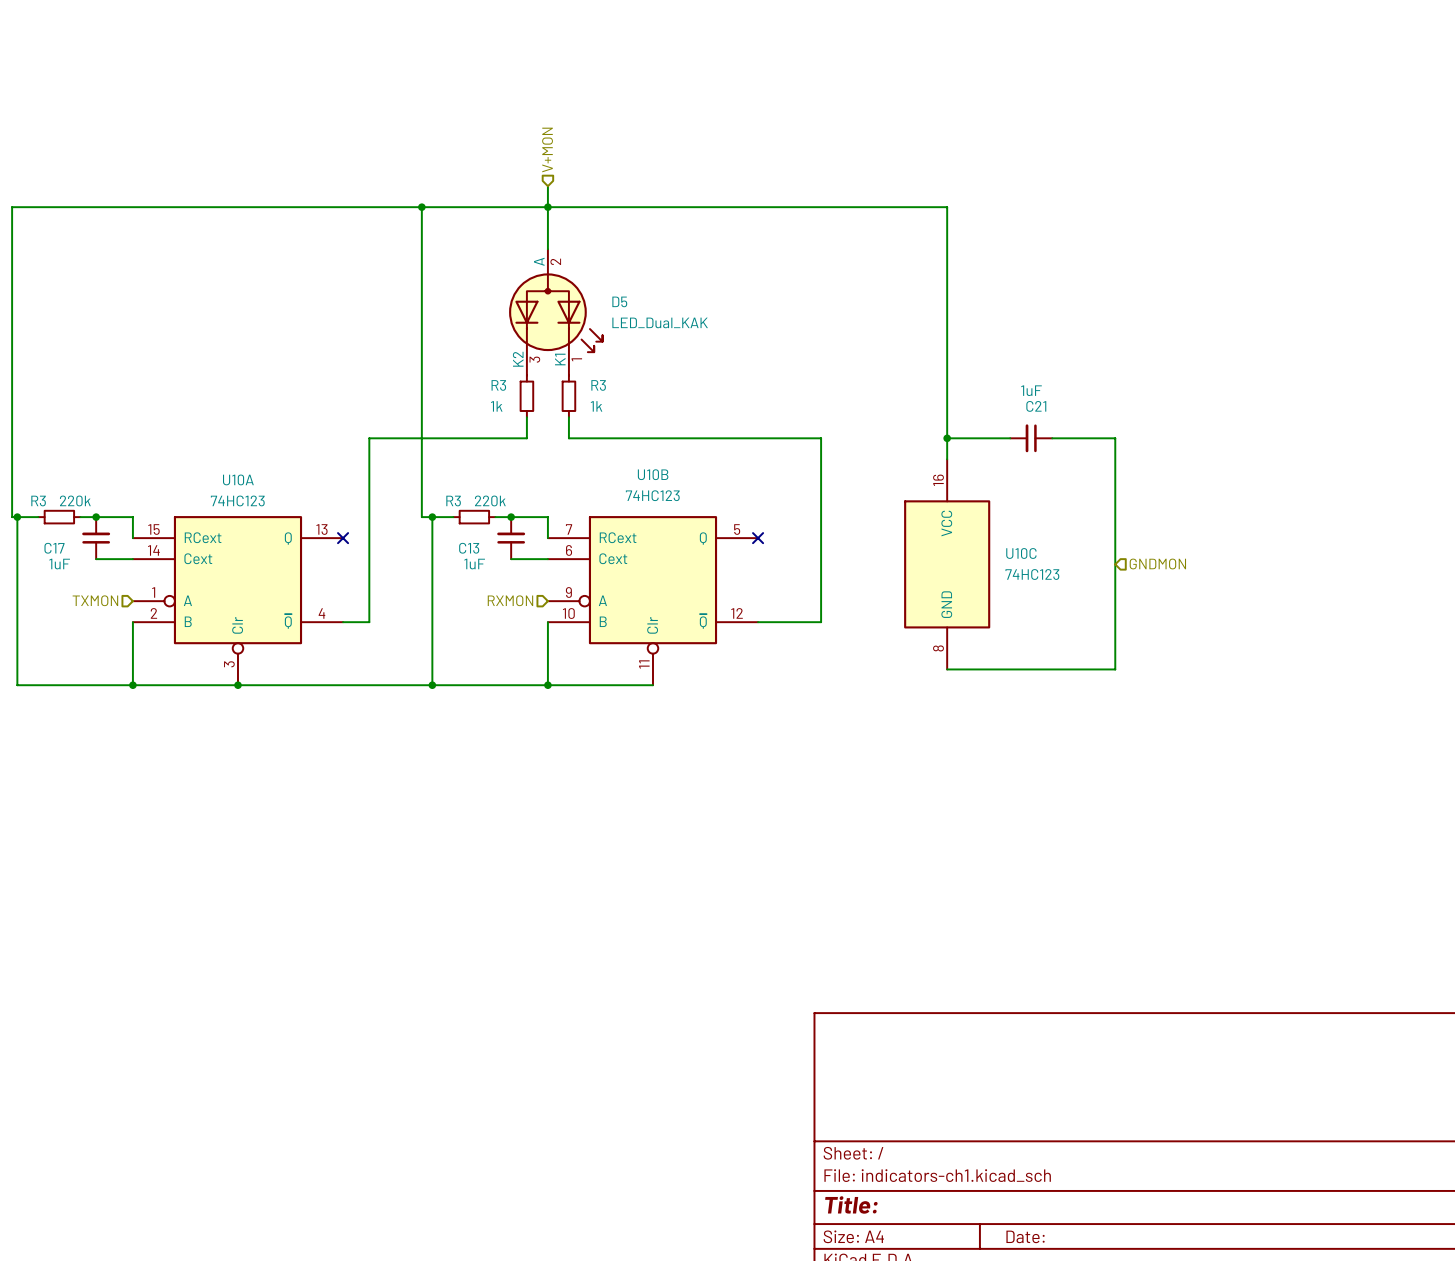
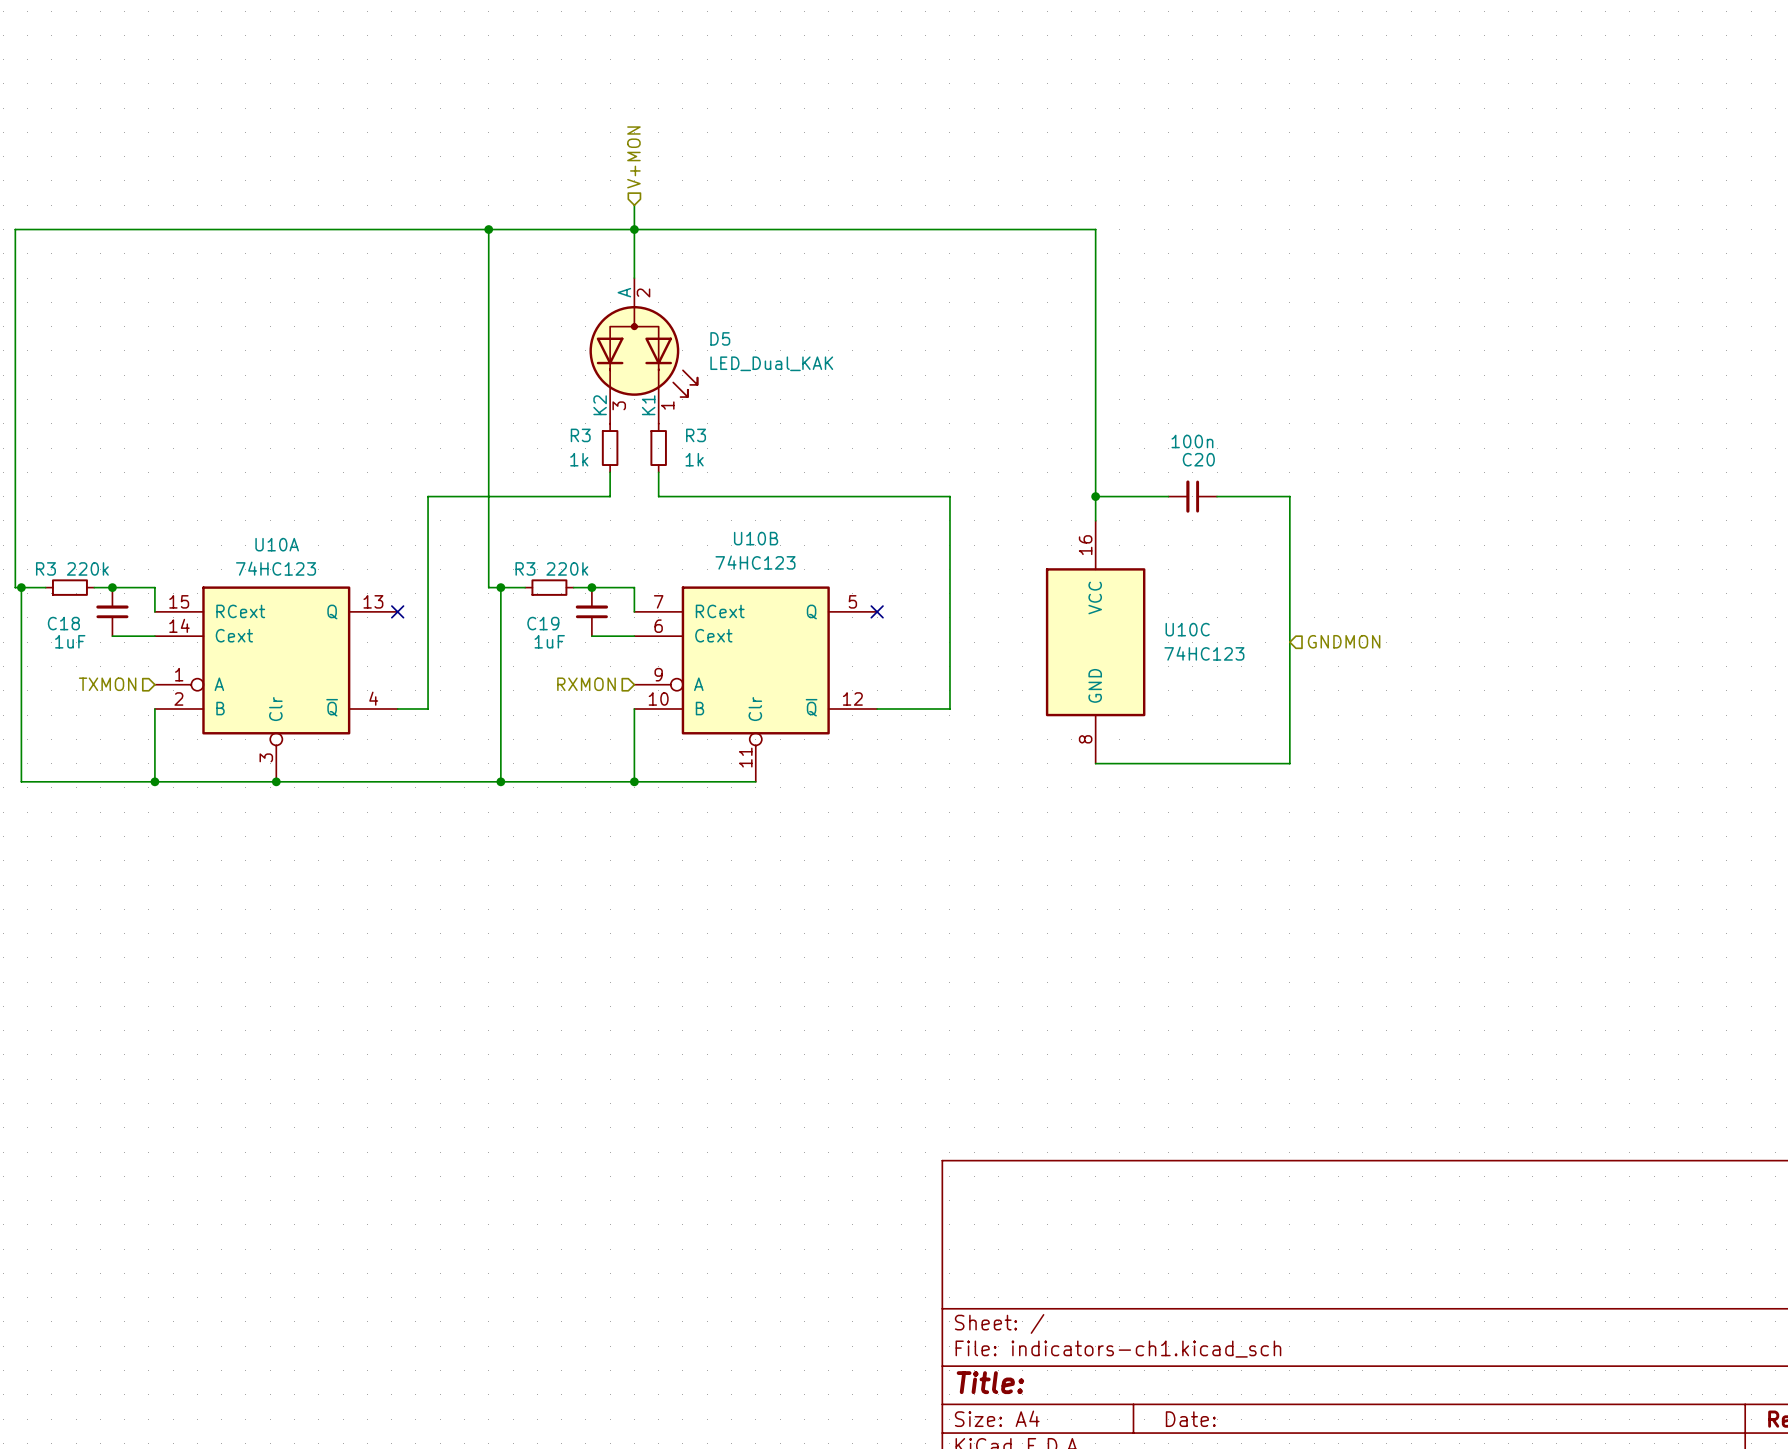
C21 value: 1uF (1031, 390) -> 100n (1192, 441)
C21 name: C21 (1036, 406) -> C20 (1198, 459)
C17 name: C17 (54, 548) -> C18 (63, 623)
C13 name: C13 (469, 548) -> C19 (543, 623)

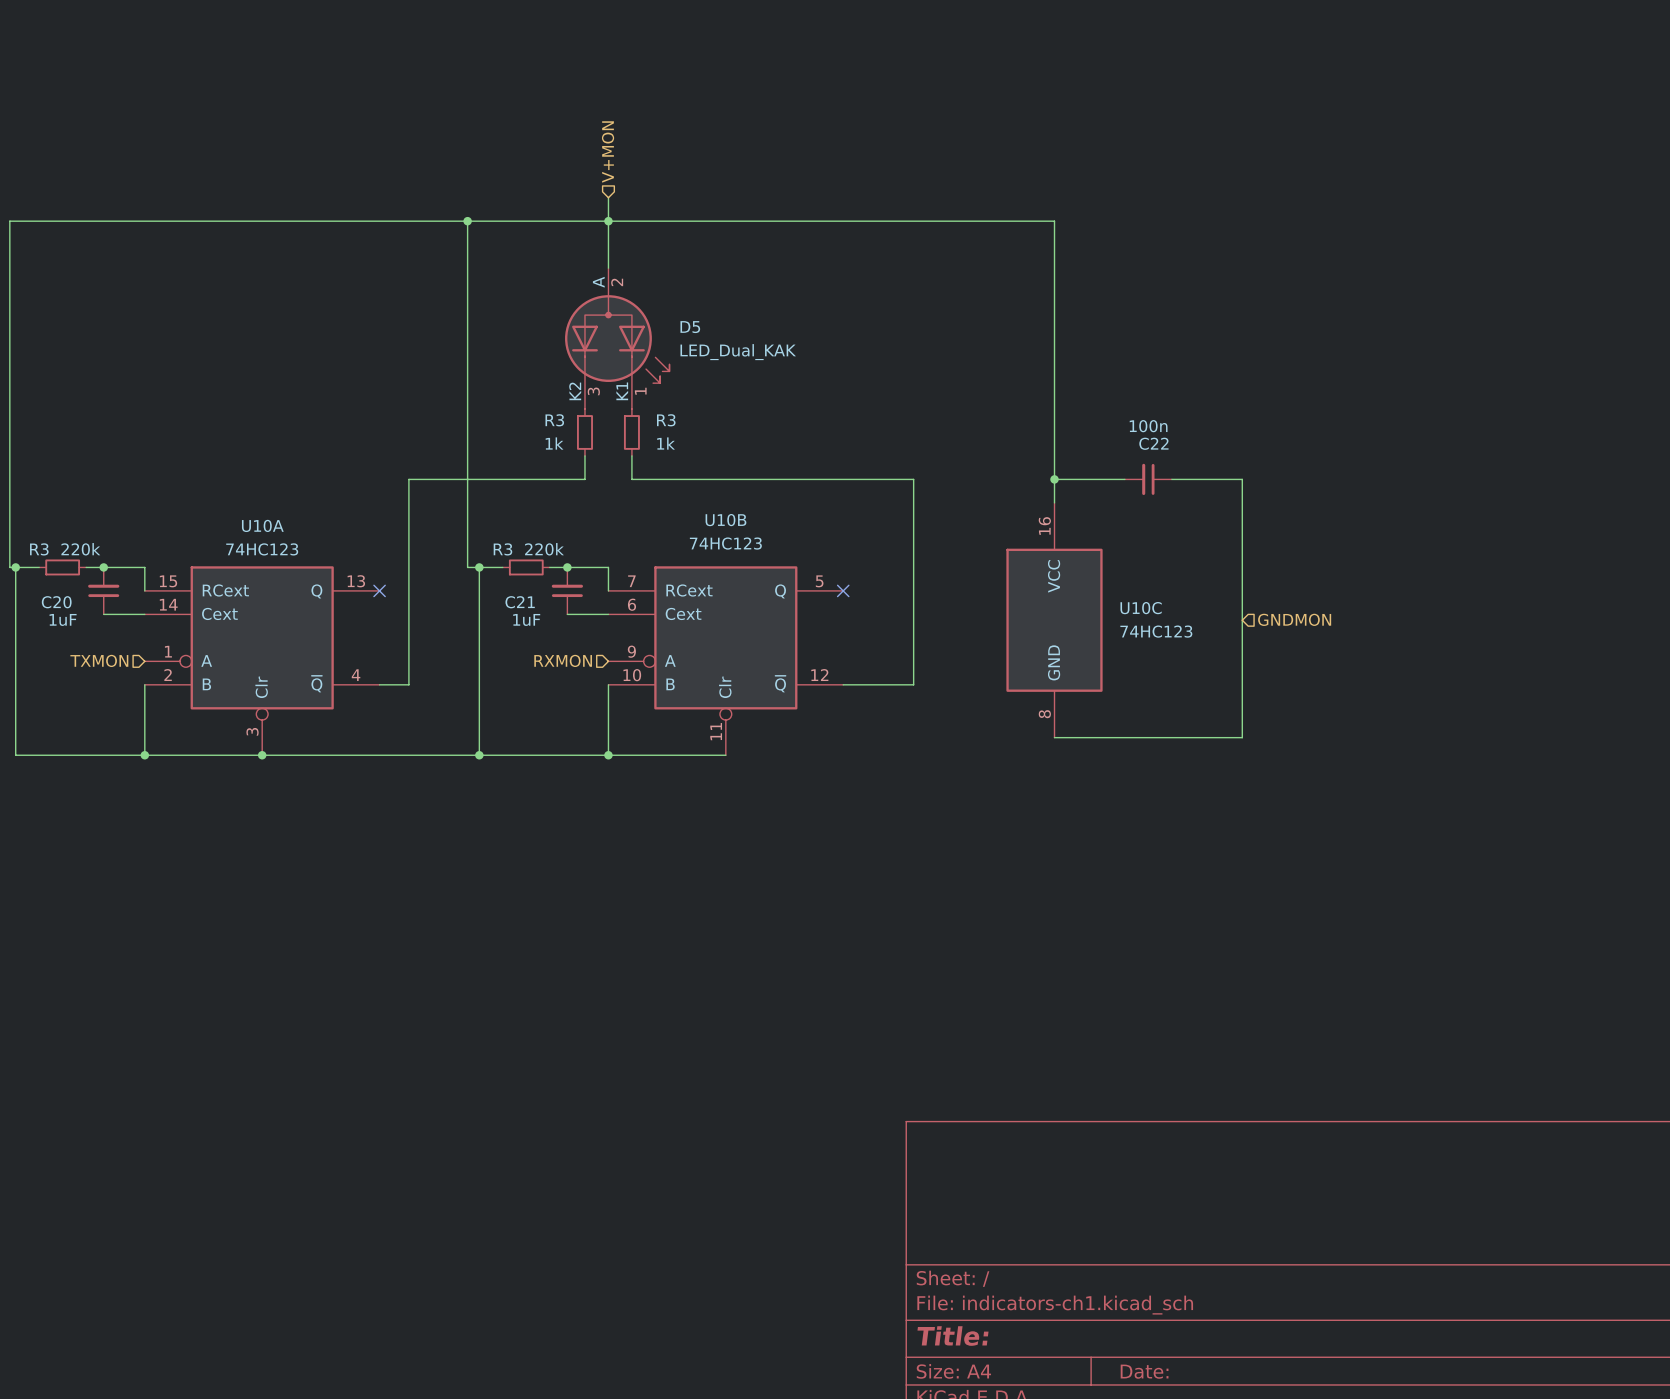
C20 name: C20 (1198, 459) -> C22 (1153, 443)
C18 name: C18 (63, 623) -> C20 (56, 602)
C19 name: C19 (543, 623) -> C21 (520, 602)

